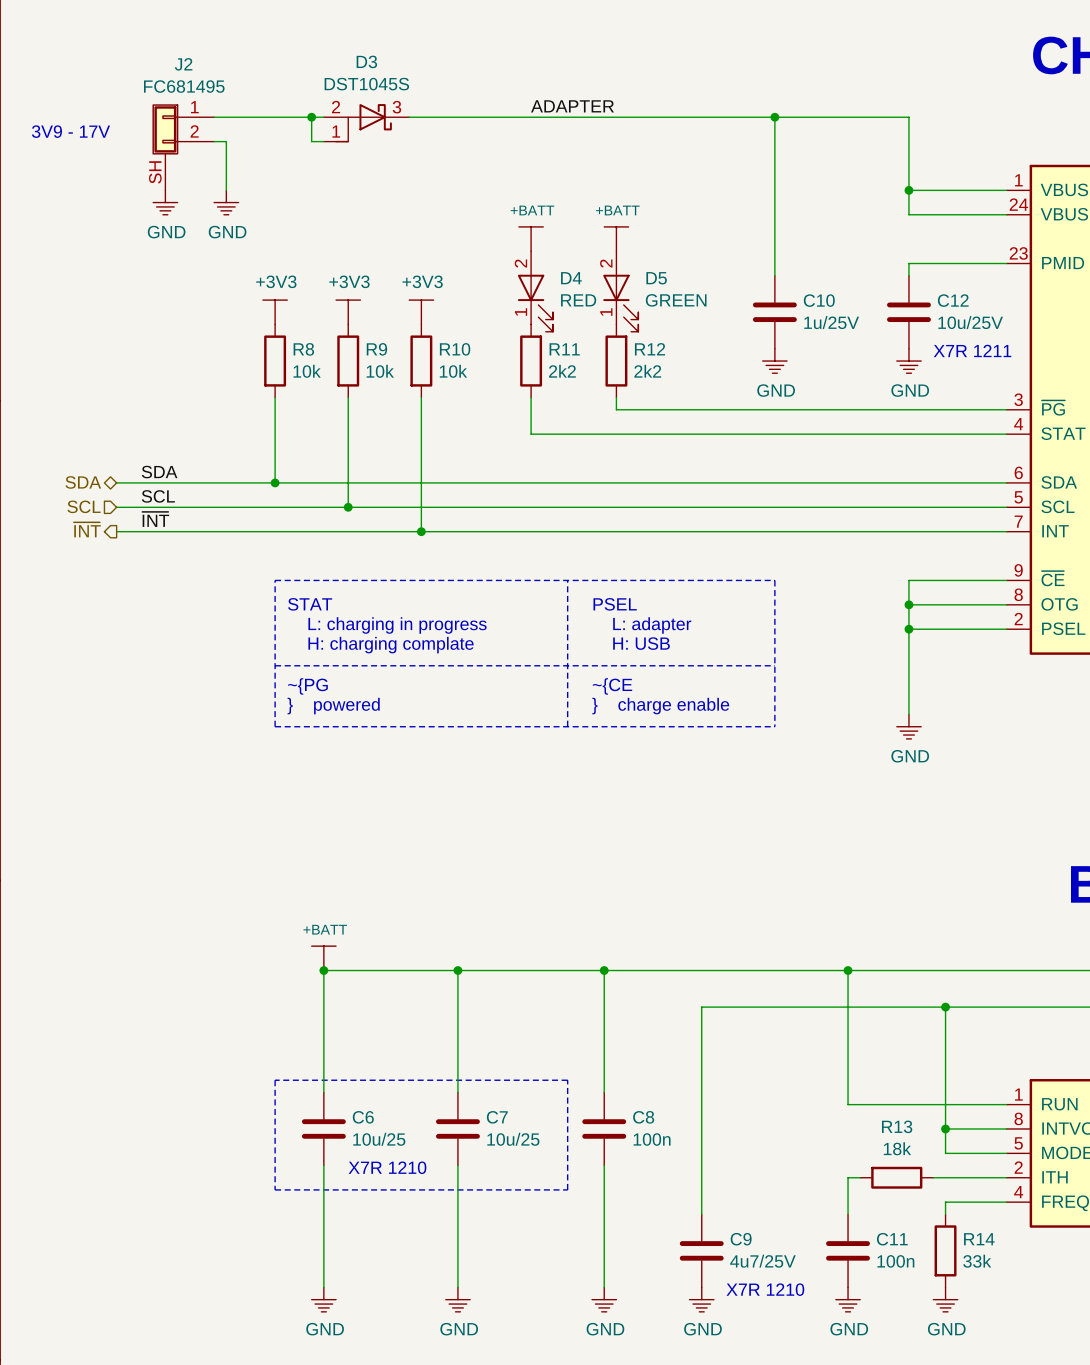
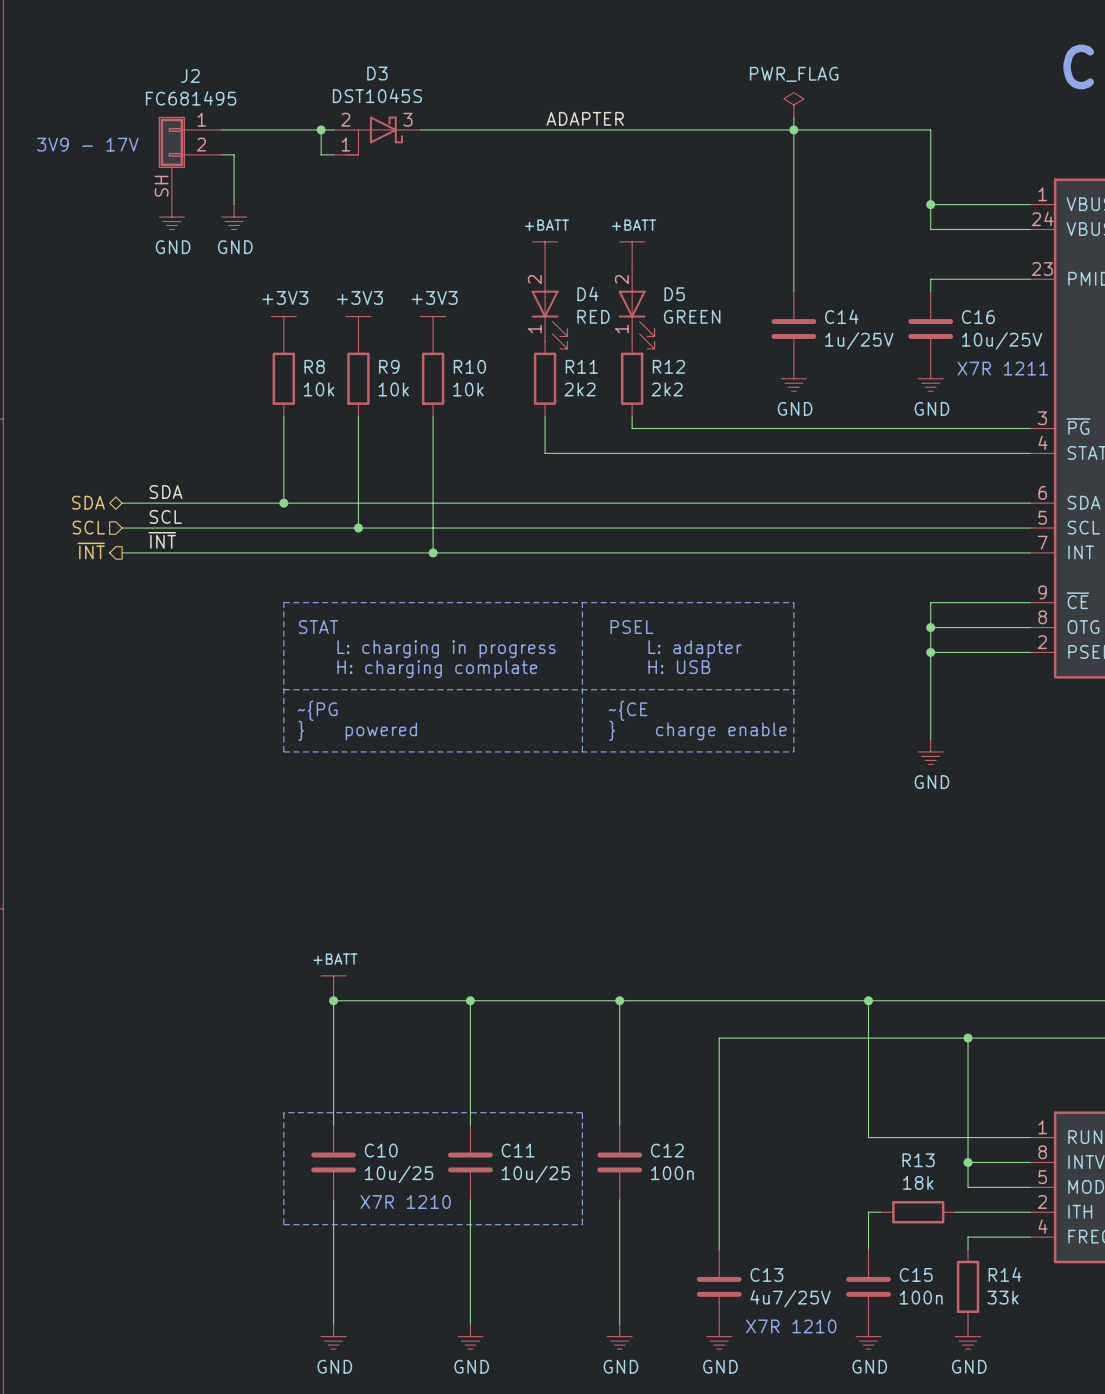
power symbol: none -> PWR_FLAG (793, 105)
wire: none -> (793, 117) (793, 129)
C10 name: C10 (819, 300) -> C14 (841, 316)
C12 name: C12 (953, 300) -> C16 (978, 317)
C6 name: C6 (363, 1117) -> C10 (381, 1150)
C7 name: C7 (497, 1117) -> C11 (518, 1150)
C8 name: C8 (643, 1117) -> C12 (667, 1150)
C9 name: C9 (741, 1239) -> C13 (766, 1274)
C11 name: C11 (892, 1239) -> C15 (916, 1274)

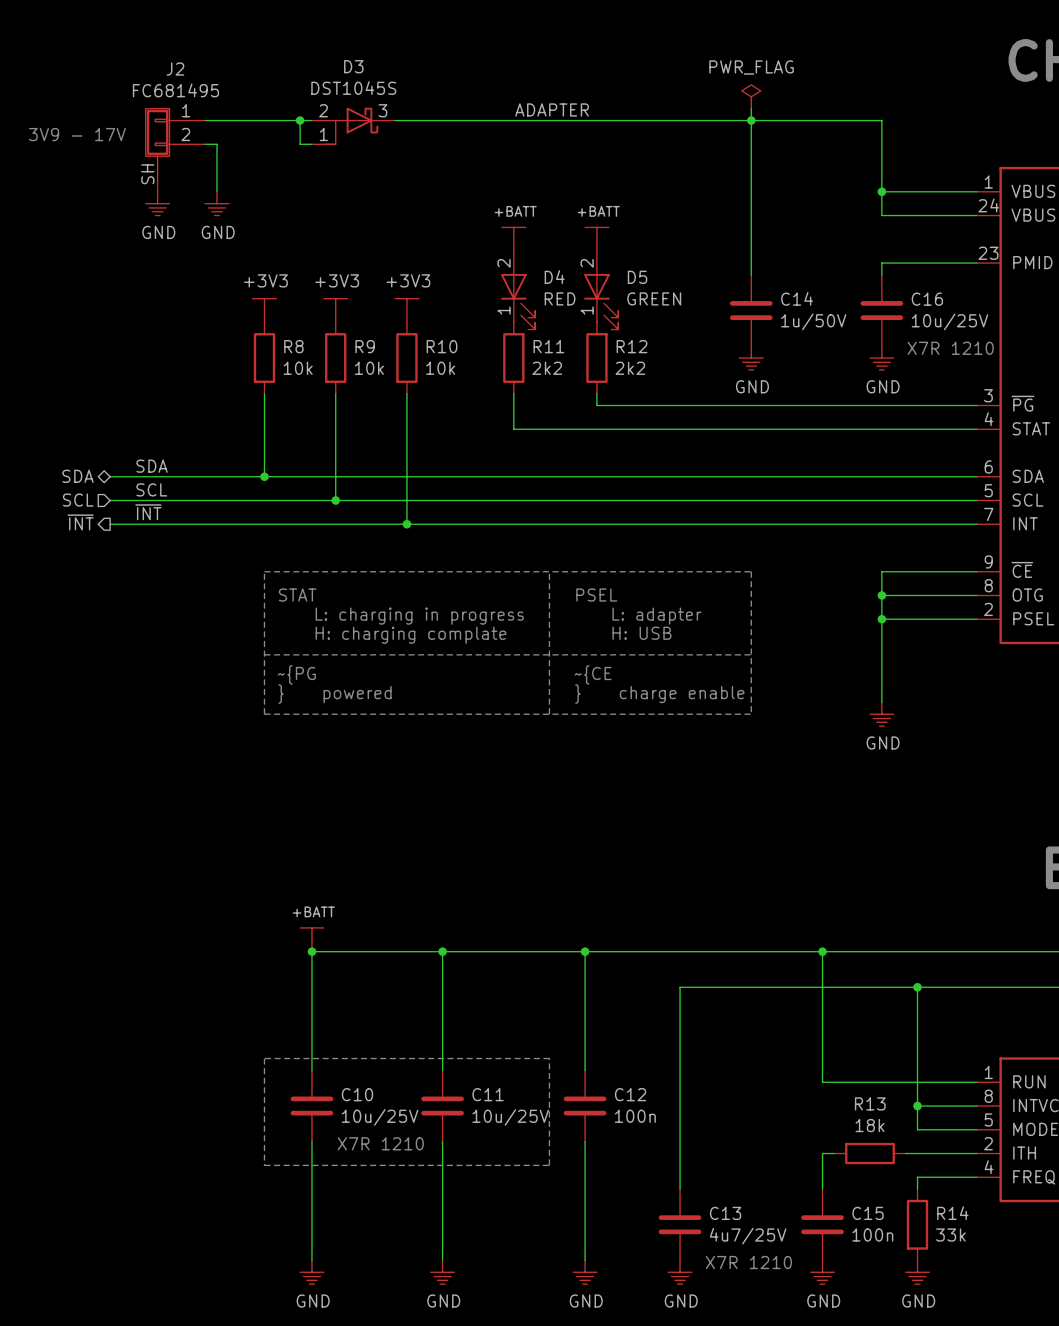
C14 value: 1u/25V (859, 340) -> 1u/50V (813, 321)
text: X7R 1211 (1002, 368) -> X7R 1210 (950, 348)
C10 value: 10u/25 (399, 1174) -> 10u/25V (380, 1117)
C11 value: 10u/25 (535, 1174) -> 10u/25V (510, 1117)

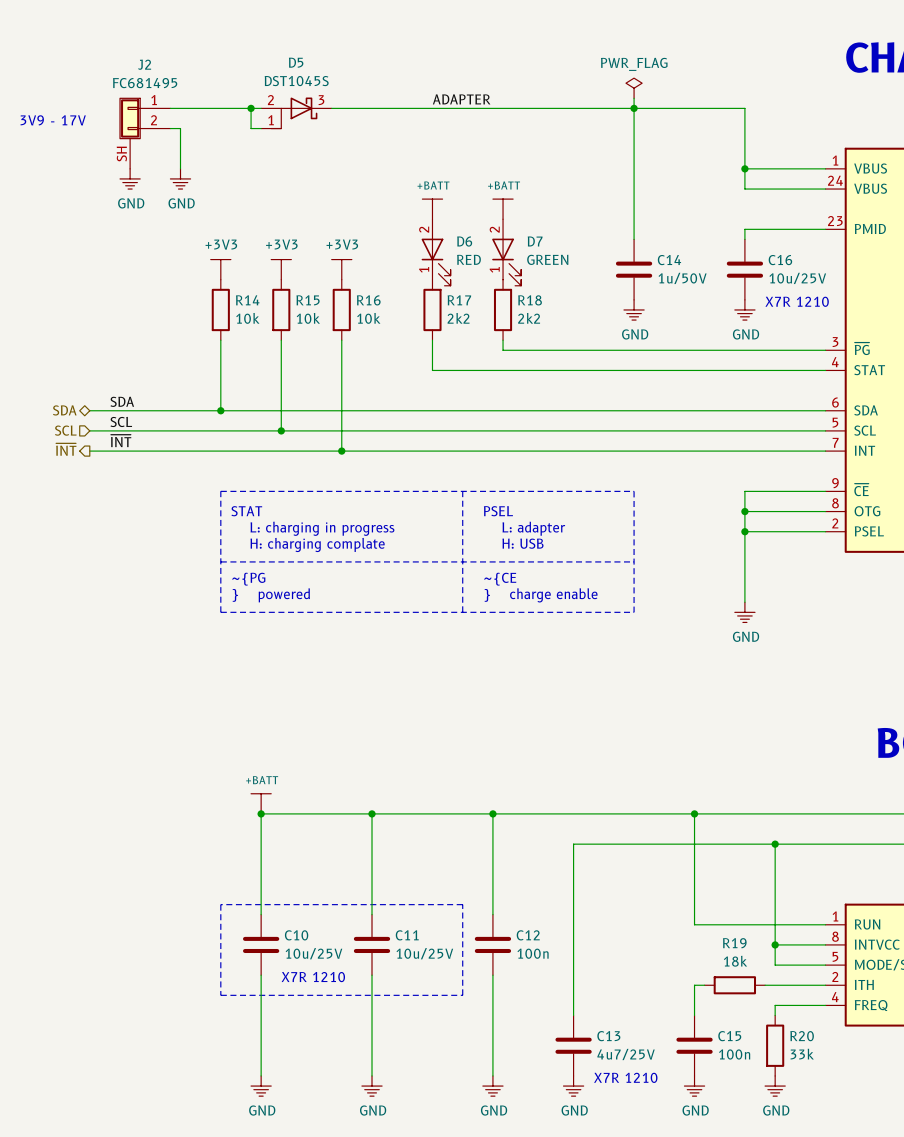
D3 name: D3 (353, 66) -> D5 (296, 62)
D4 name: D4 (554, 277) -> D6 (464, 241)
D5 name: D5 (637, 277) -> D7 (535, 241)
R8 name: R8 (293, 346) -> R14 (247, 300)
R9 name: R9 (365, 346) -> R15 (308, 300)
R10 name: R10 (442, 346) -> R16 (368, 300)
R11 name: R11 (548, 346) -> R17 (459, 300)
R12 name: R12 (632, 346) -> R18 (530, 300)
R13 name: R13 (870, 1103) -> R19 (734, 943)
R14 name: R14 (952, 1213) -> R20 (802, 1036)

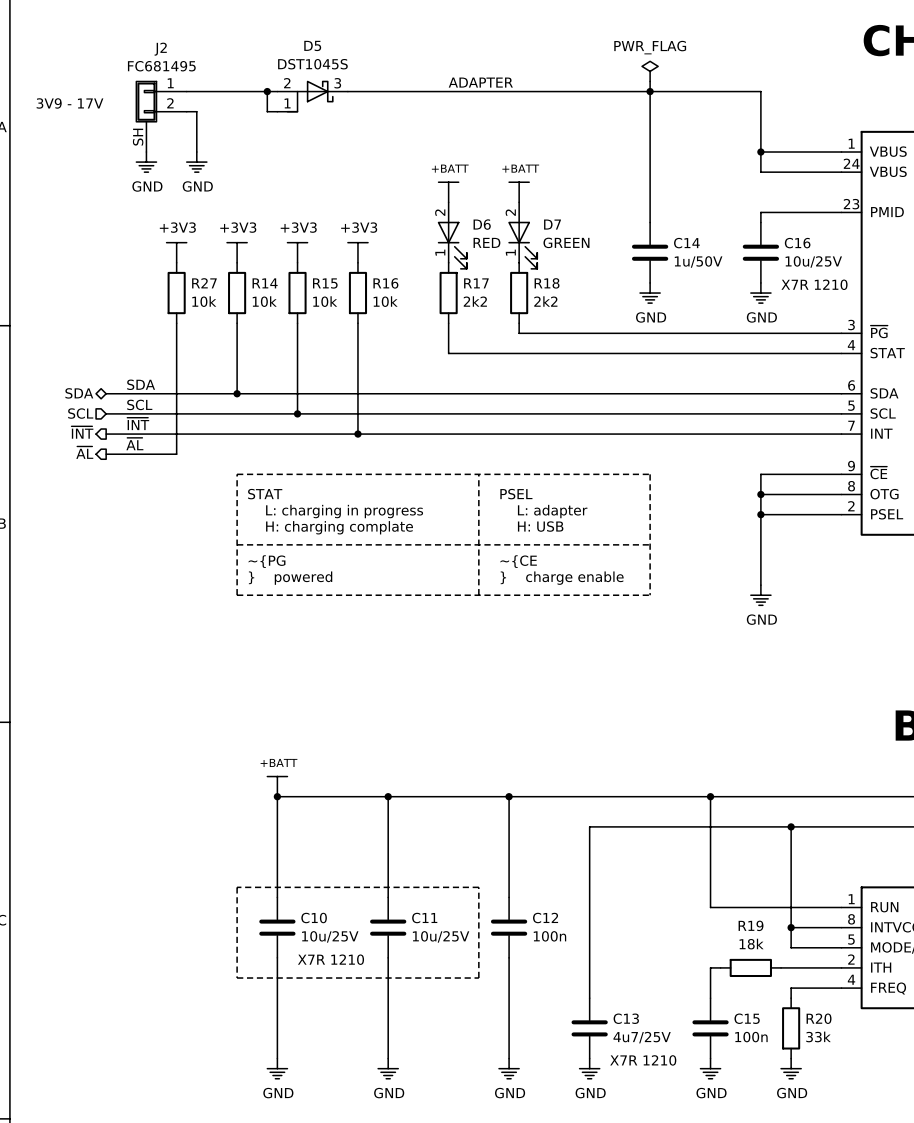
power symbol: none -> +3V3 (176, 252)
R27: none -> 10k (176, 293)
wire: none -> (176, 323) (176, 454) (106, 454)
label: none -> ~{AL} (134, 444)
hierarchical label: none -> ~{AL} (84, 452)

